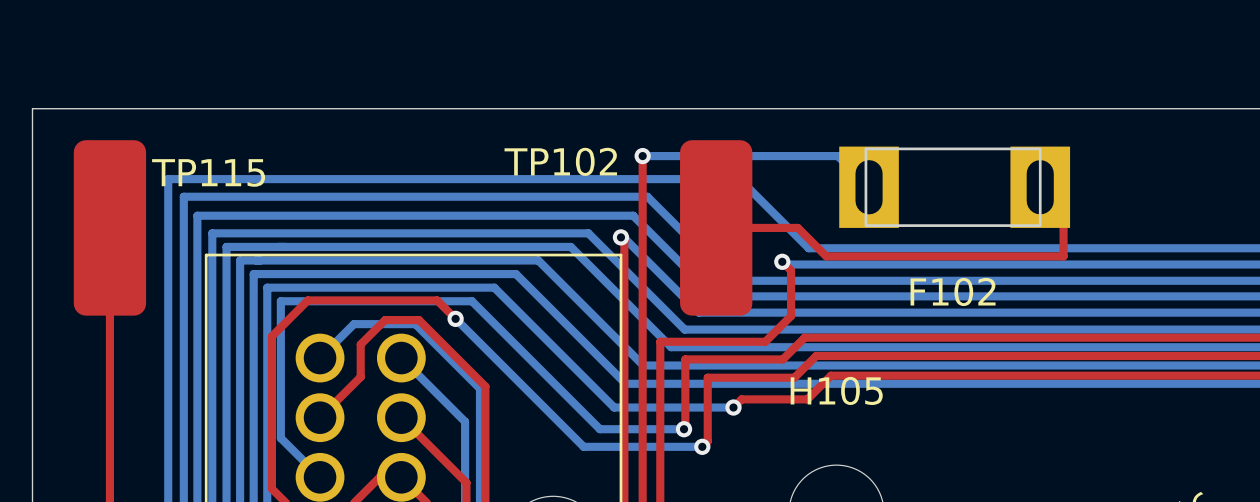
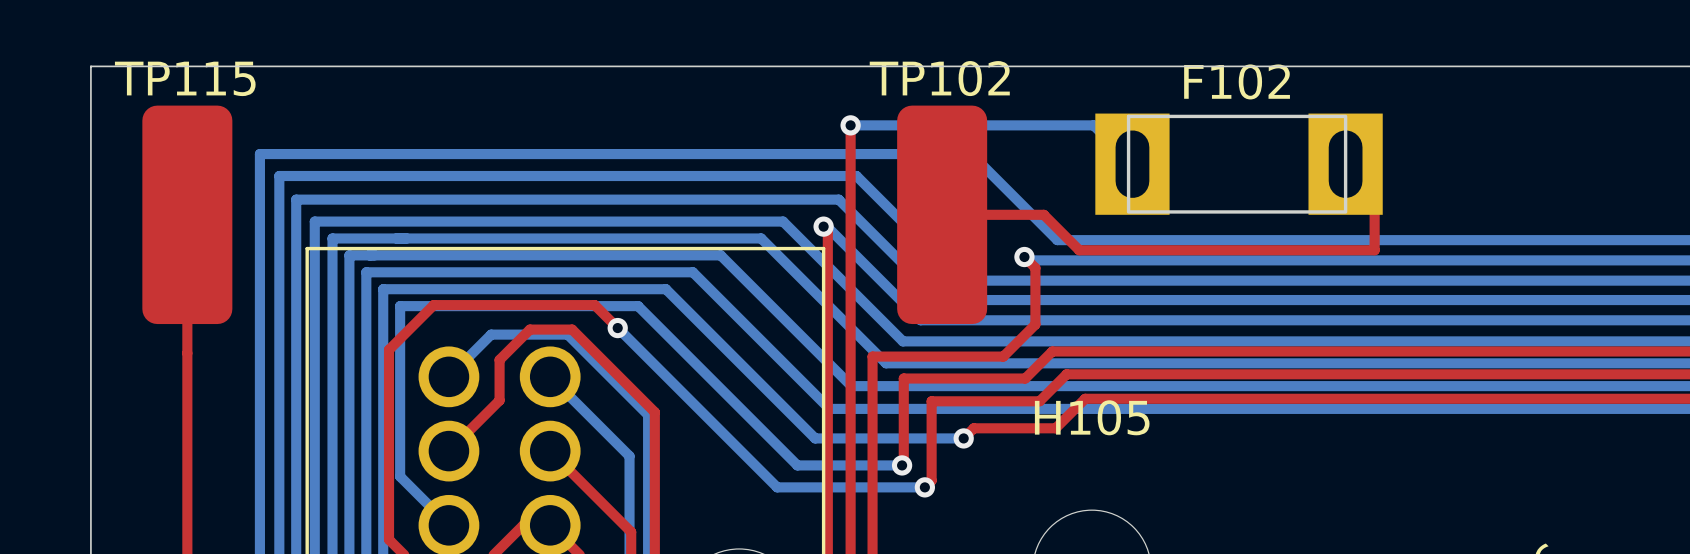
TP102 name position: TP102 (560, 161) -> TP102 (939, 78)
TP115 name position: TP115 (208, 172) -> TP115 (185, 78)
F102 name position: F102 (953, 291) -> F102 (1237, 81)

